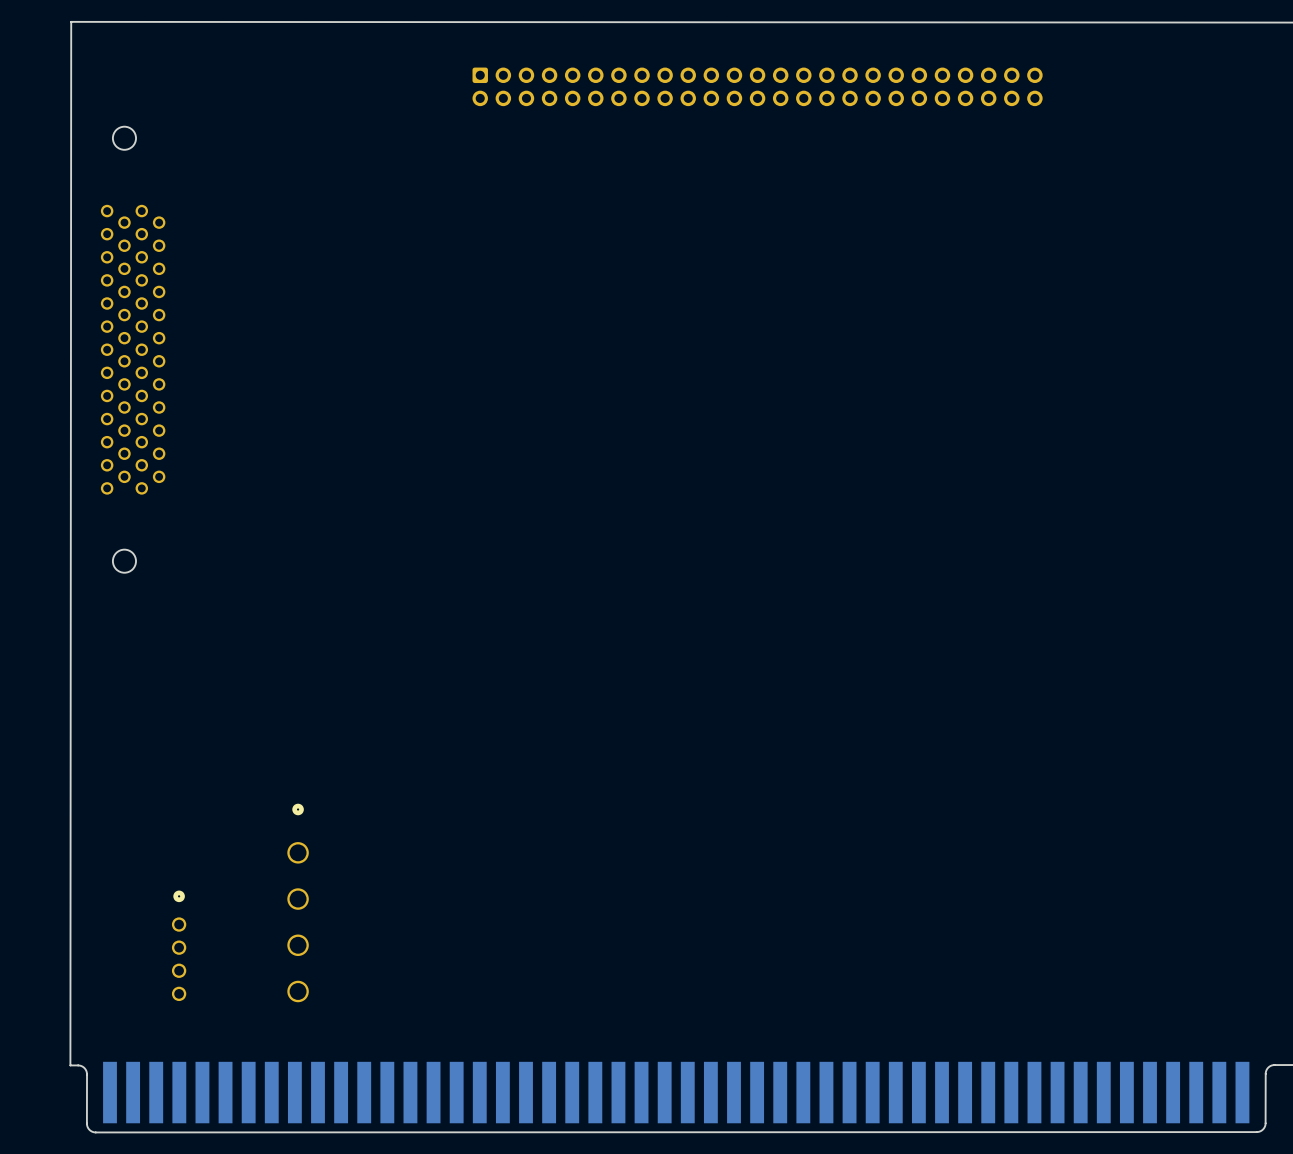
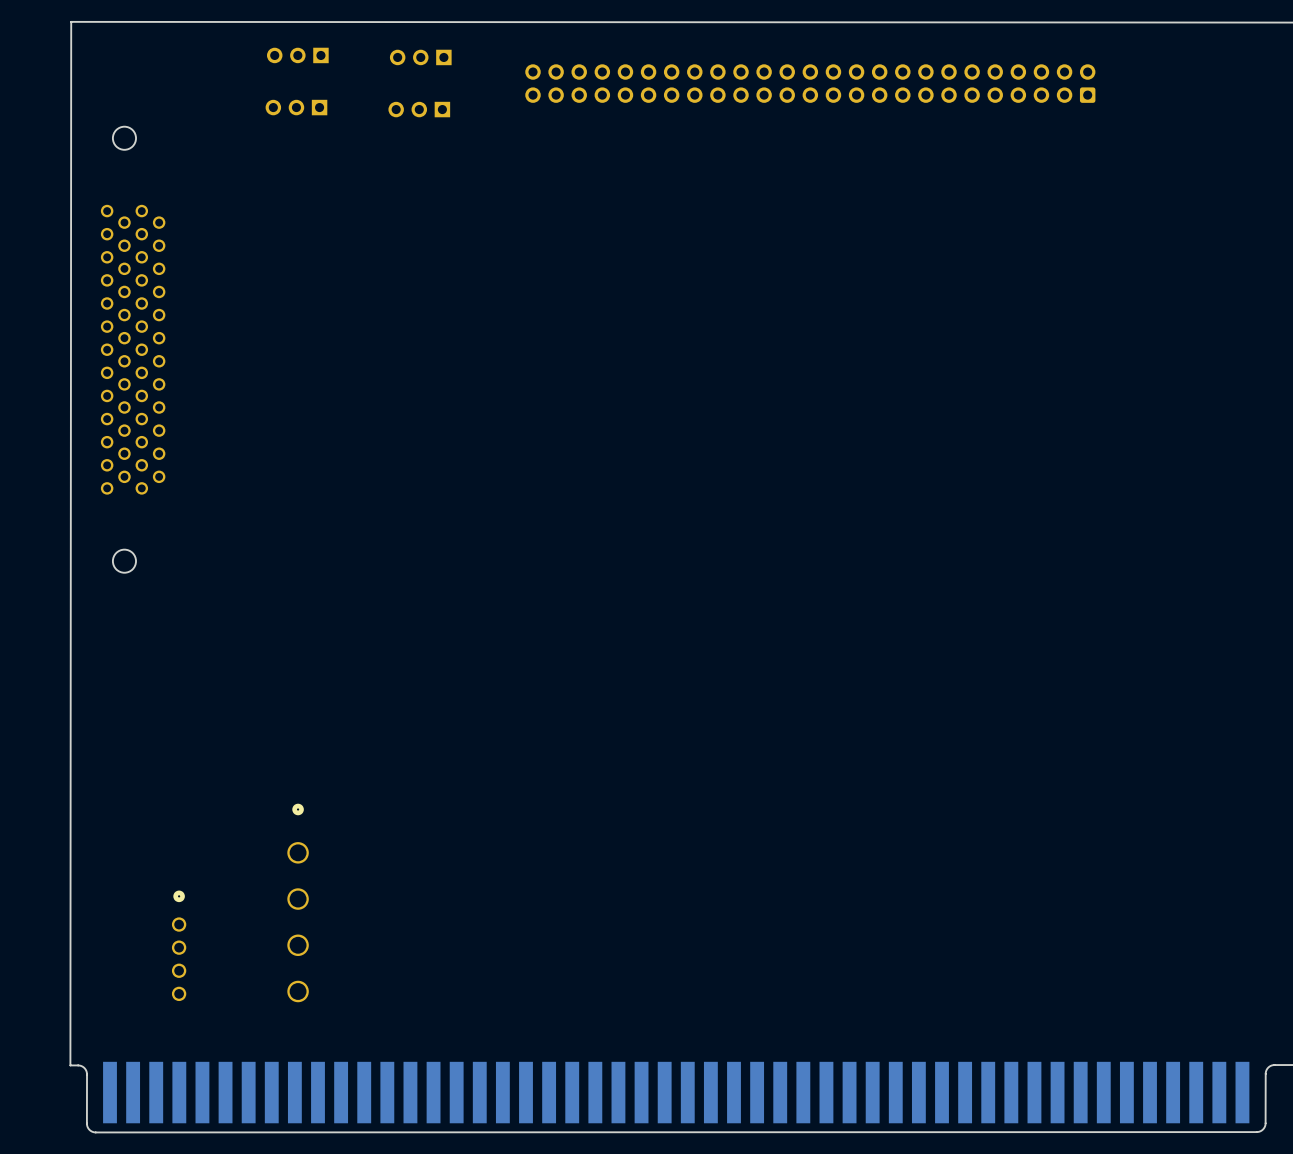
part: none -> (297, 55)
part: none -> (420, 57)
part rotation: 0° (757, 86) -> 180° (810, 83)
part: none -> (296, 107)
part: none -> (419, 109)

